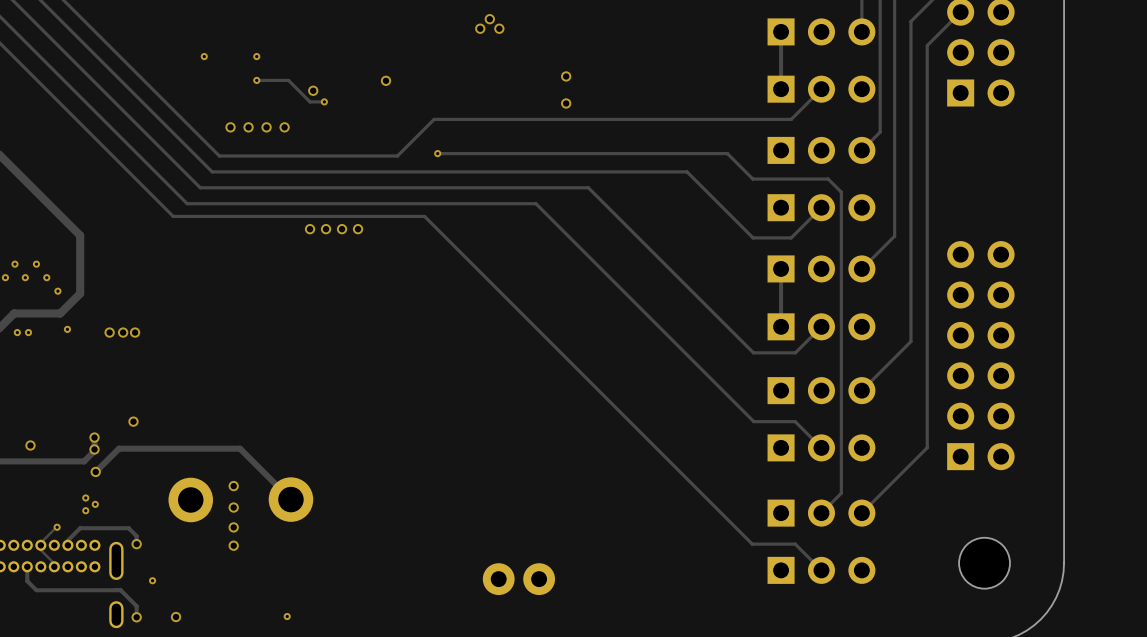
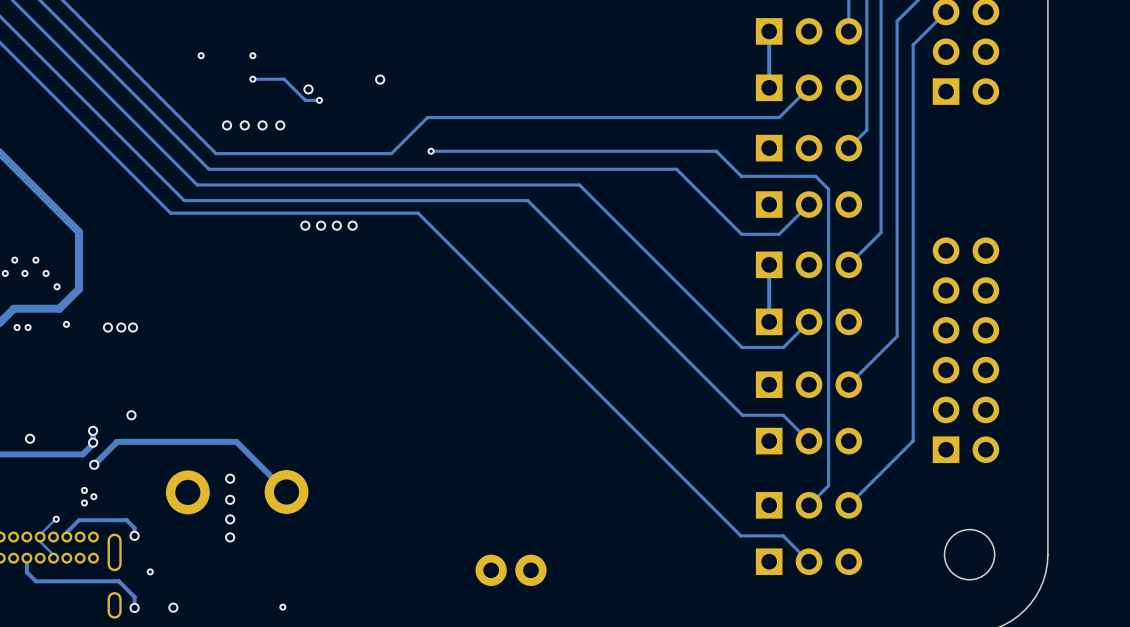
via: (489, 19) -> none
via: (480, 28) -> none
via: (499, 28) -> none
via: (566, 76) -> none
via: (566, 103) -> none

